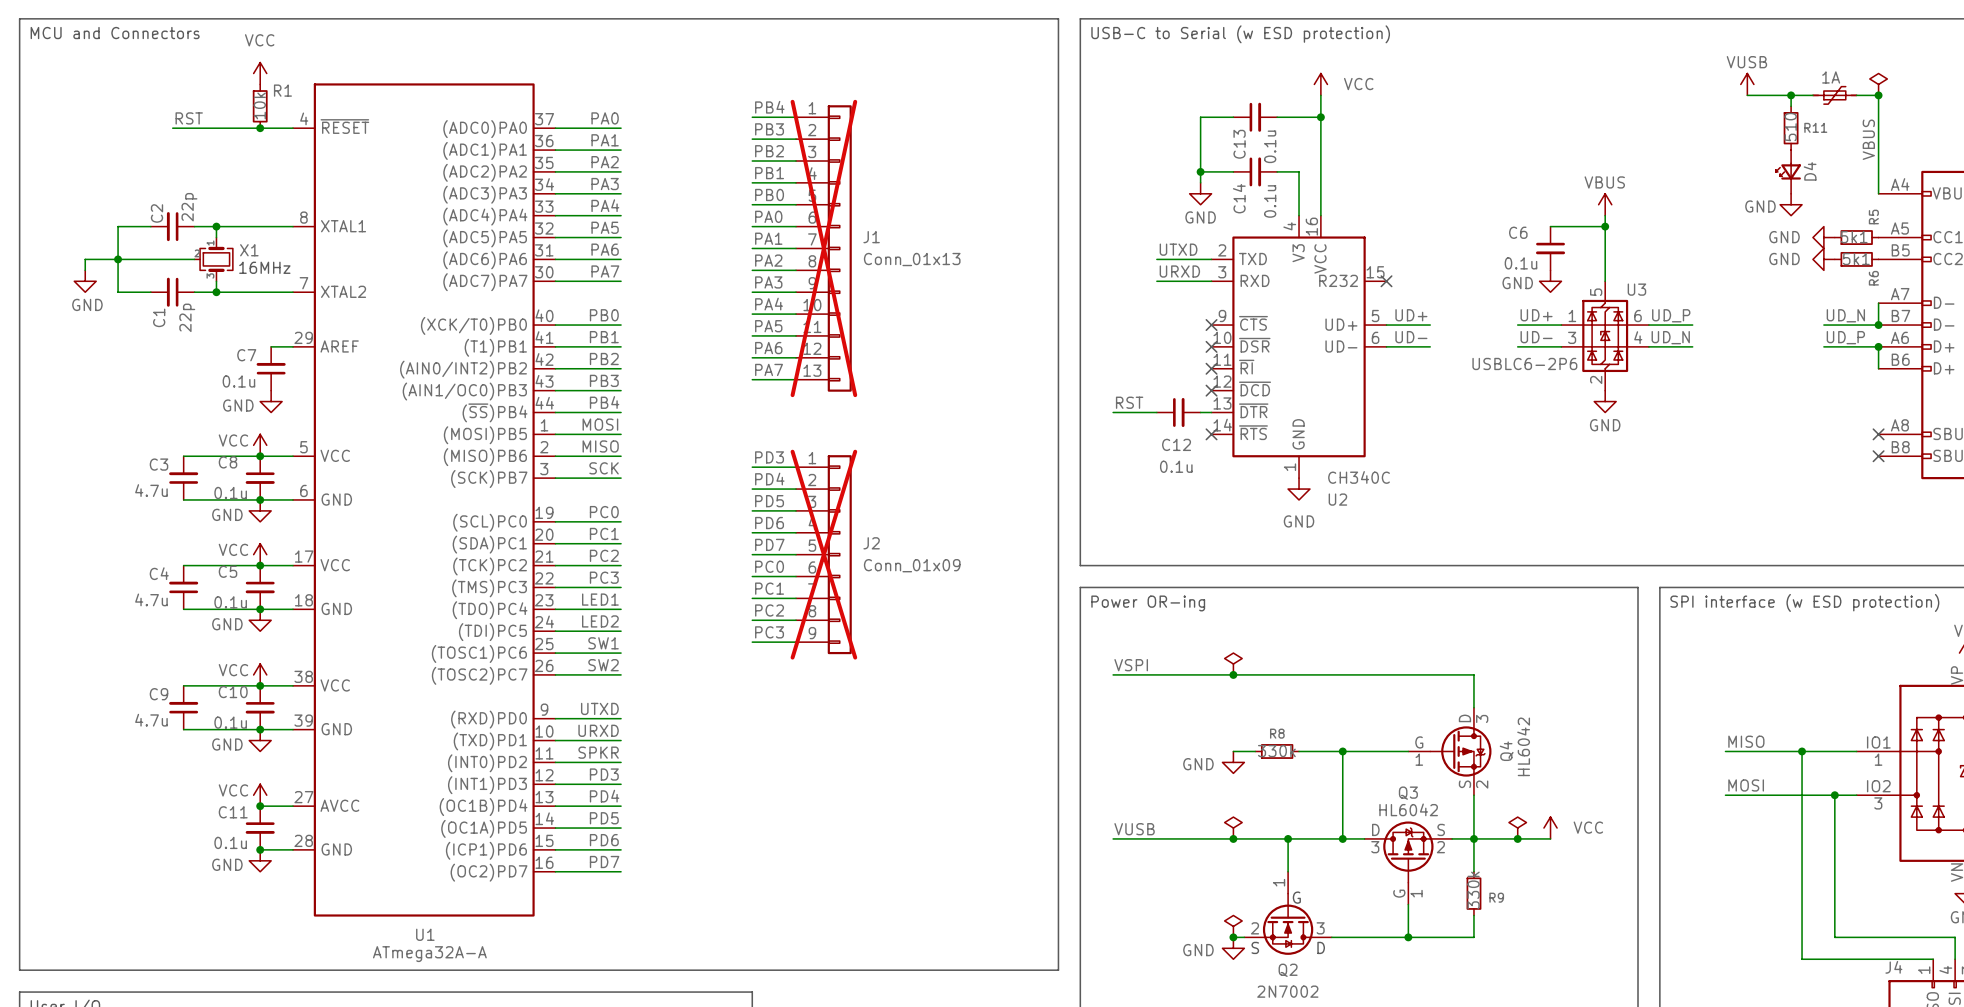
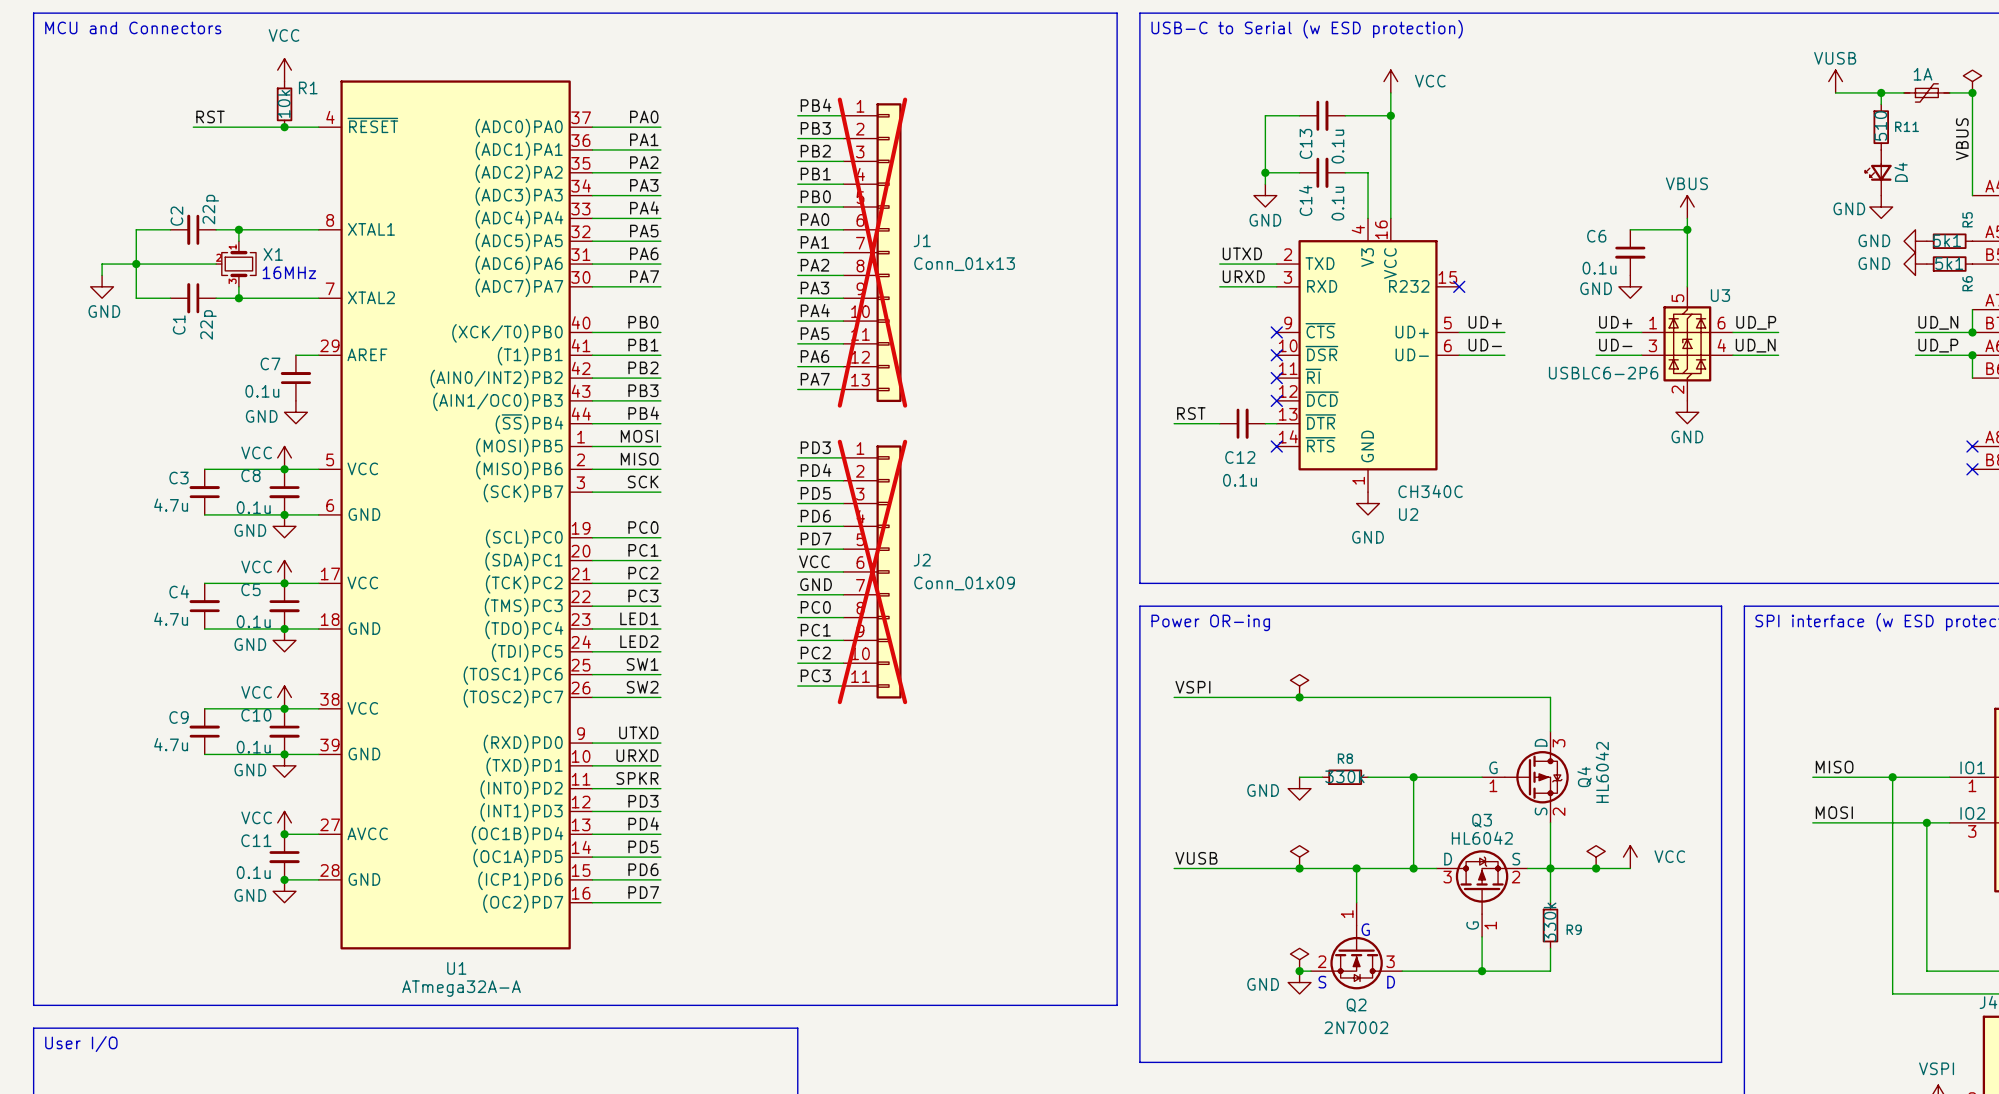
label: none -> PD3 (815, 447)
wire: none -> (797, 457) (843, 457)
J2 symbol: [796, 455, 852, 655] -> [843, 445, 902, 699]
label: PD3 (769, 457) -> PD4 (816, 470)
label: PD4 (769, 479) -> PD5 (815, 493)
label: PD5 (769, 501) -> PD6 (815, 516)
label: PD6 (769, 523) -> PD7 (816, 538)
label: PD7 (769, 544) -> VCC (814, 561)
label: PC0 (769, 566) -> GND (816, 584)
label: PC1 (769, 588) -> PC0 (815, 607)
label: PC2 (769, 610) -> PC1 (815, 630)
label: PC3 (769, 632) -> PC2 (815, 653)
label: none -> PC3 (815, 675)
wire: none -> (797, 686) (843, 686)

